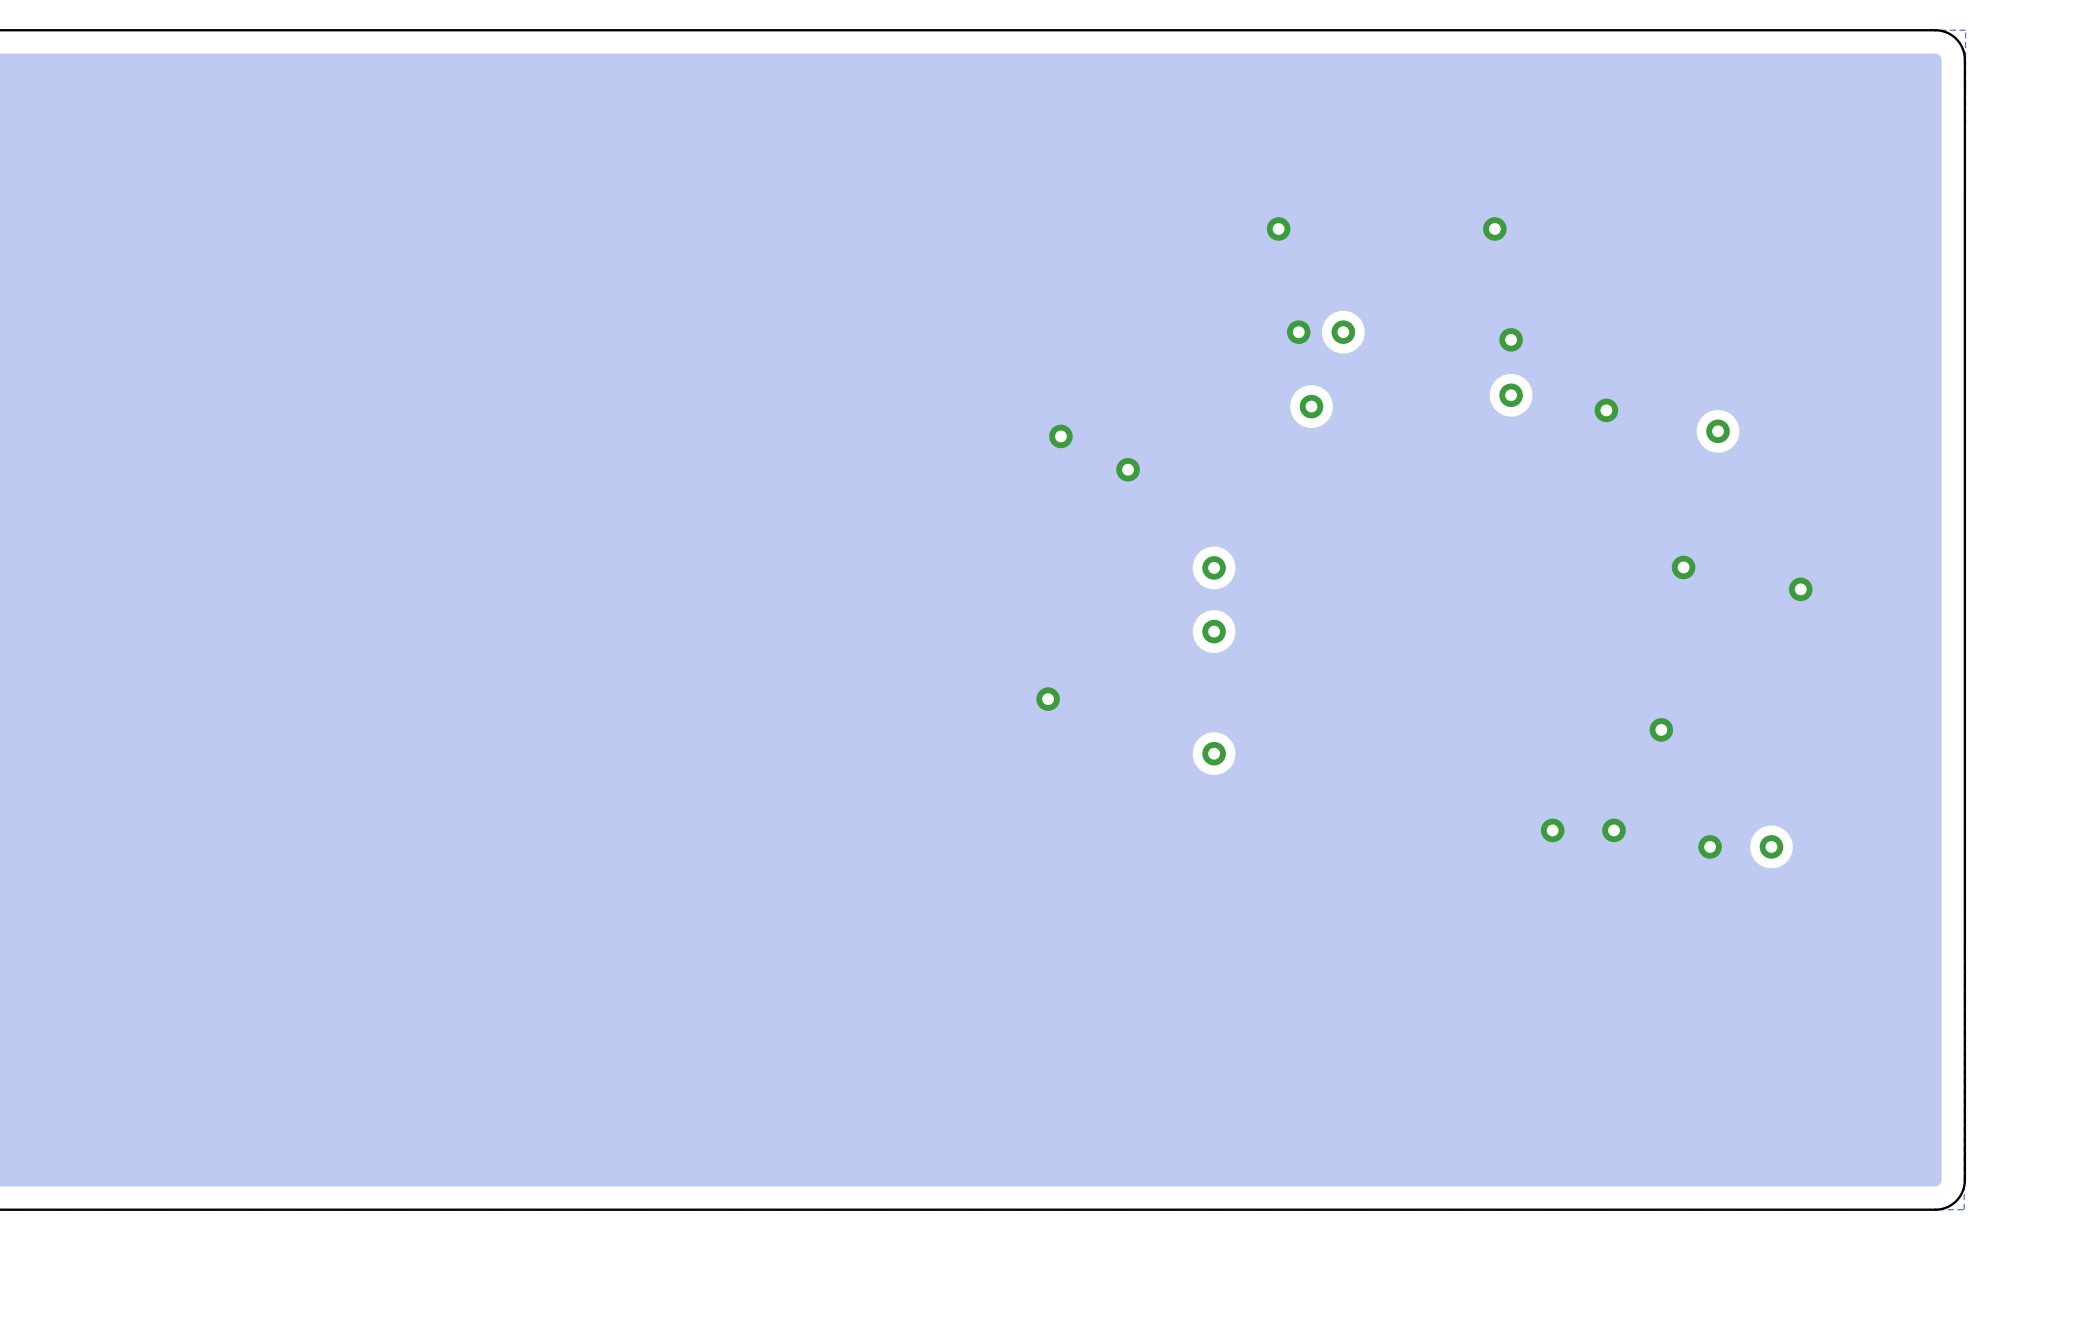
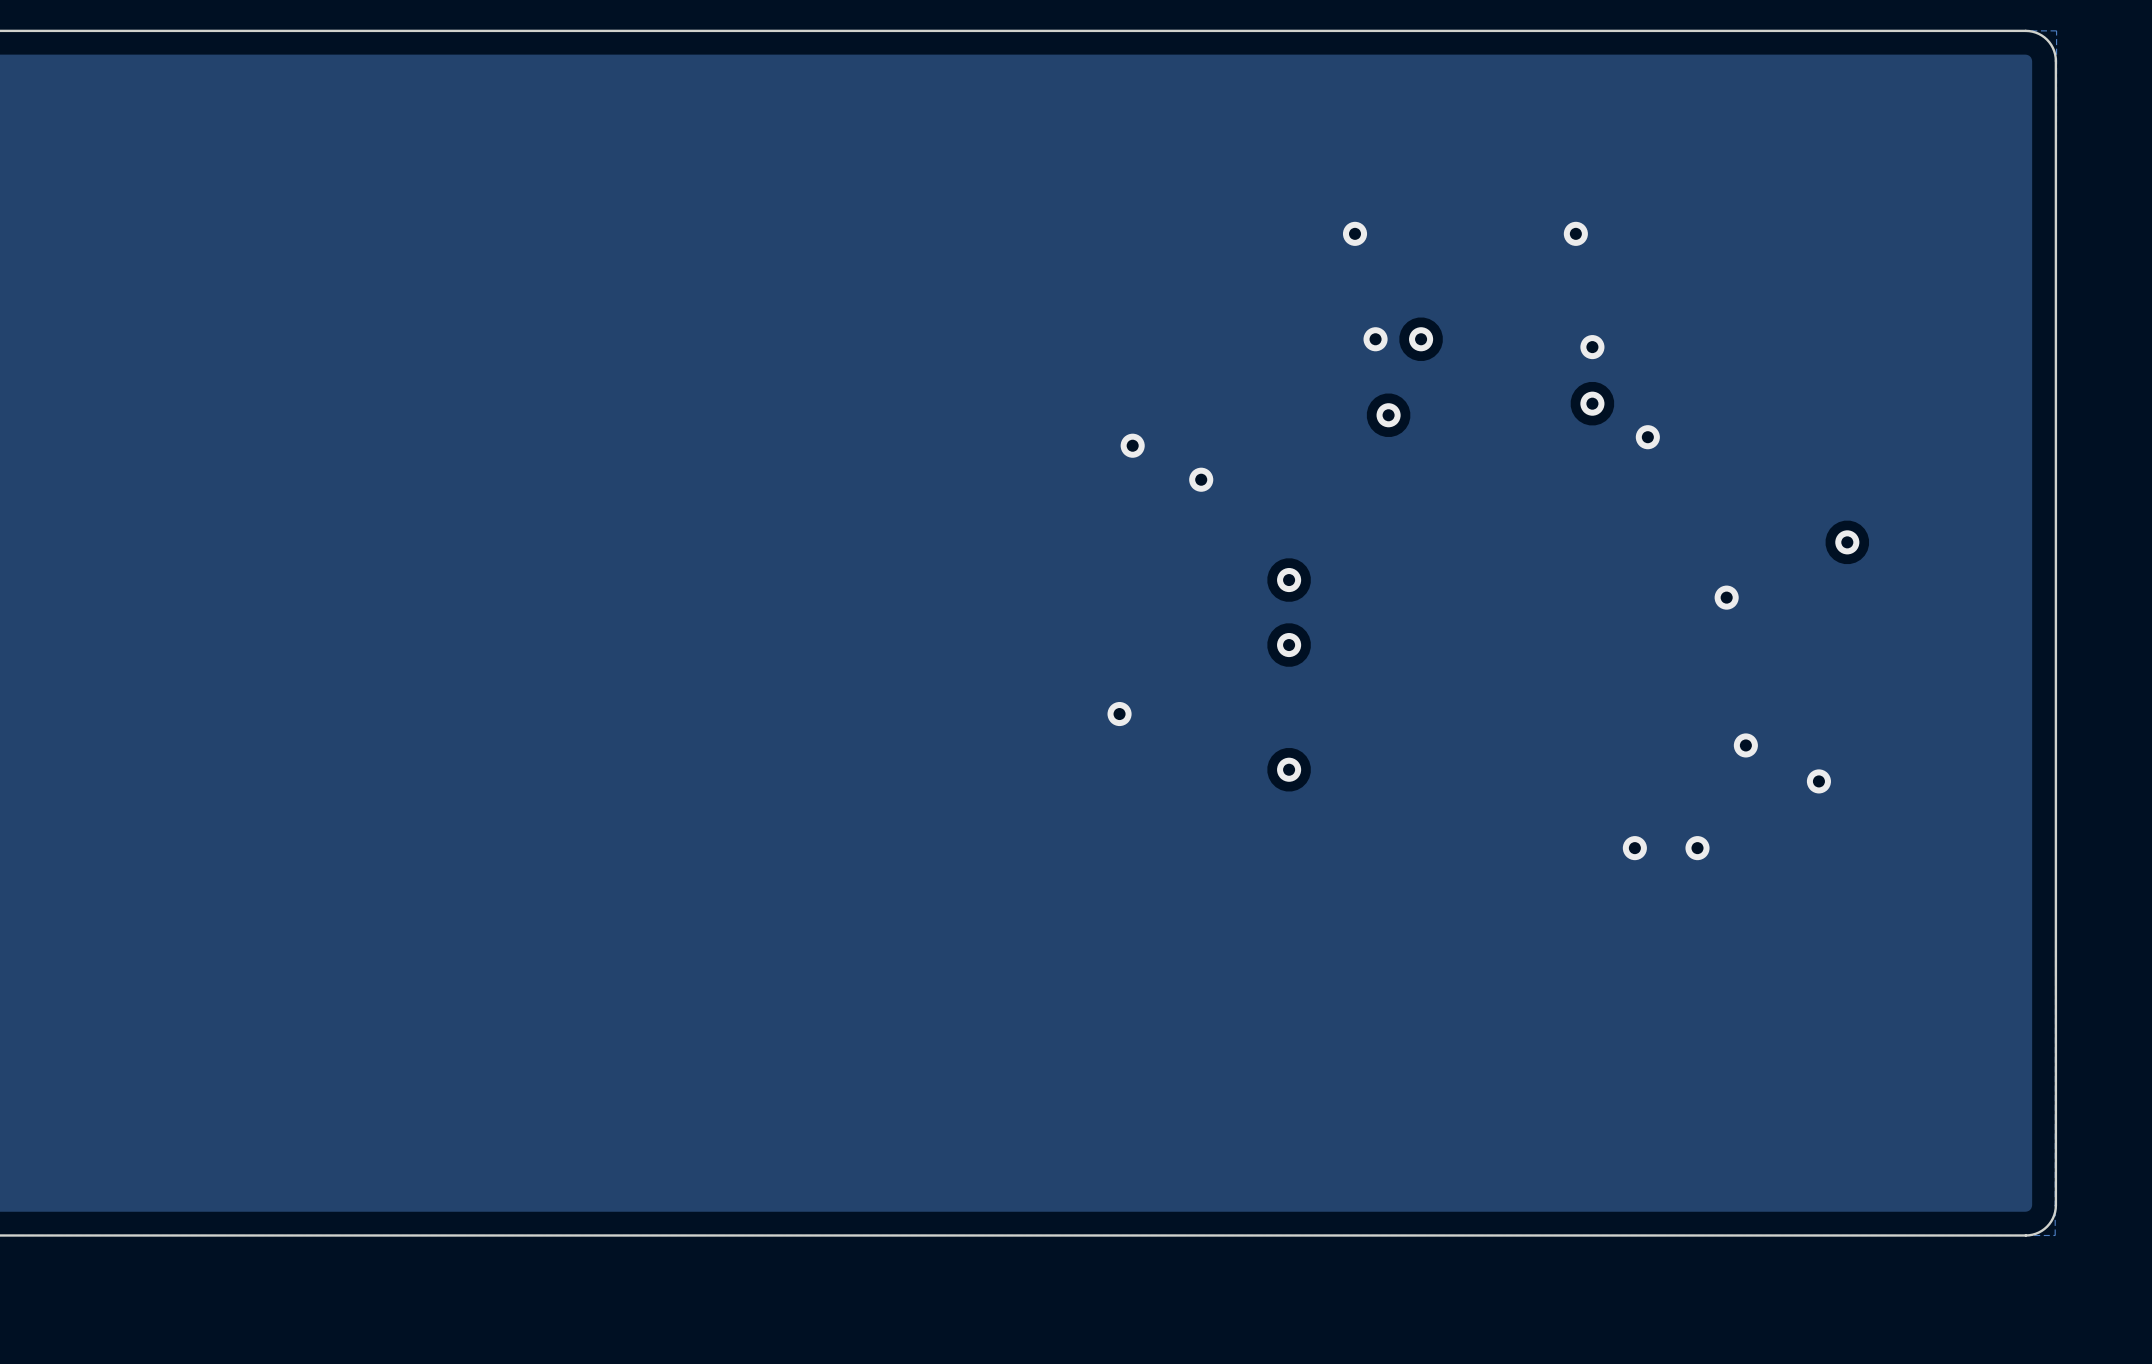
via position: (1606, 410) -> (1647, 437)
via: (1718, 431) -> none
via: none -> (1847, 542)
via: (1683, 567) -> none
via: none -> (1726, 597)
via: (1800, 589) -> none
via: none -> (1818, 781)
via: (1710, 846) -> none
via: (1771, 846) -> none

